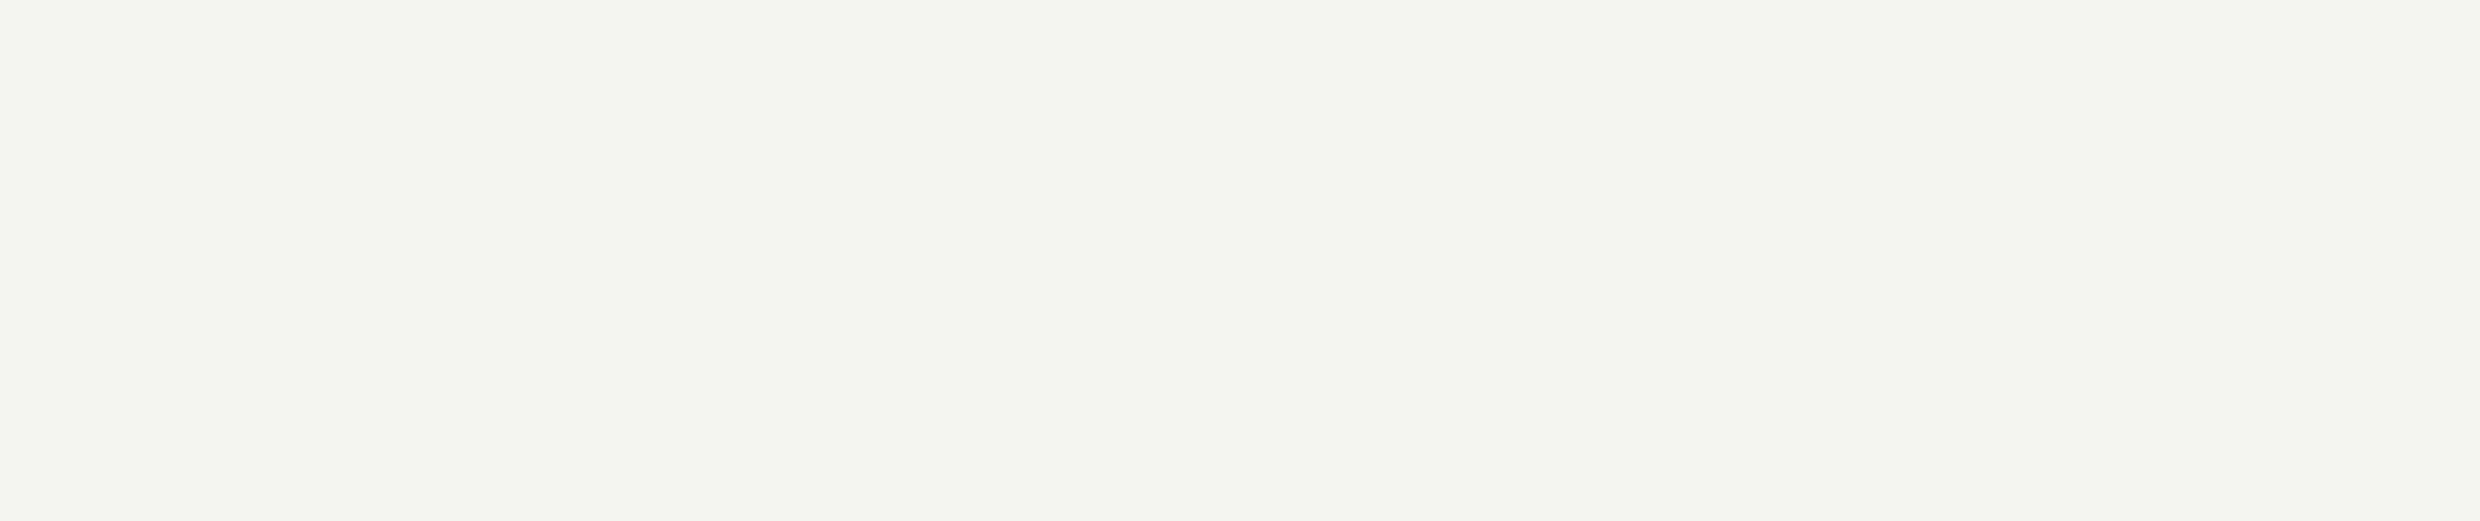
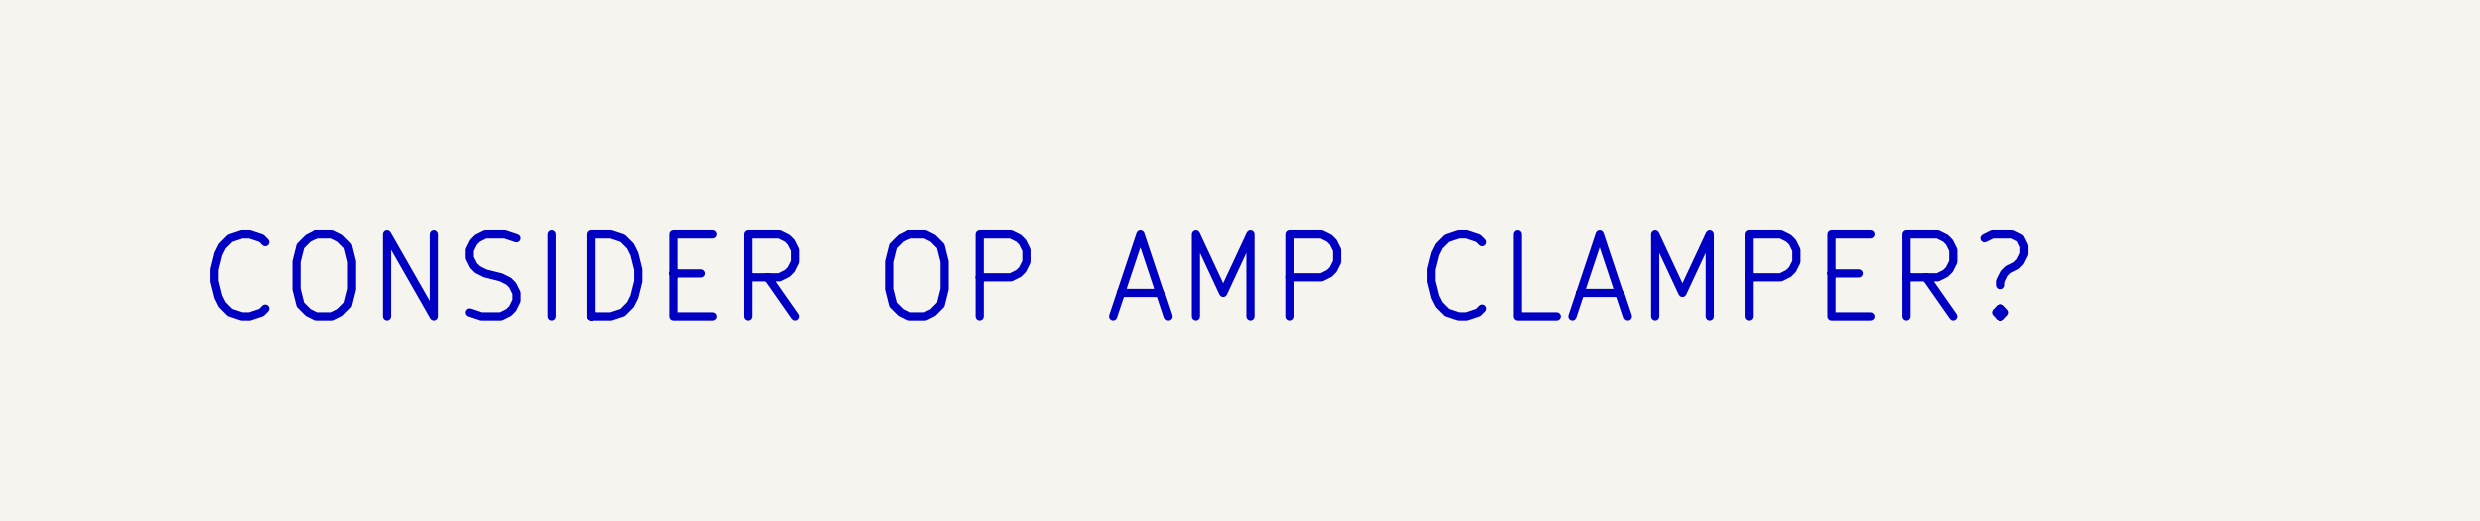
text: none -> CONSIDER OP AMP CLAMPER? (1119, 275)

